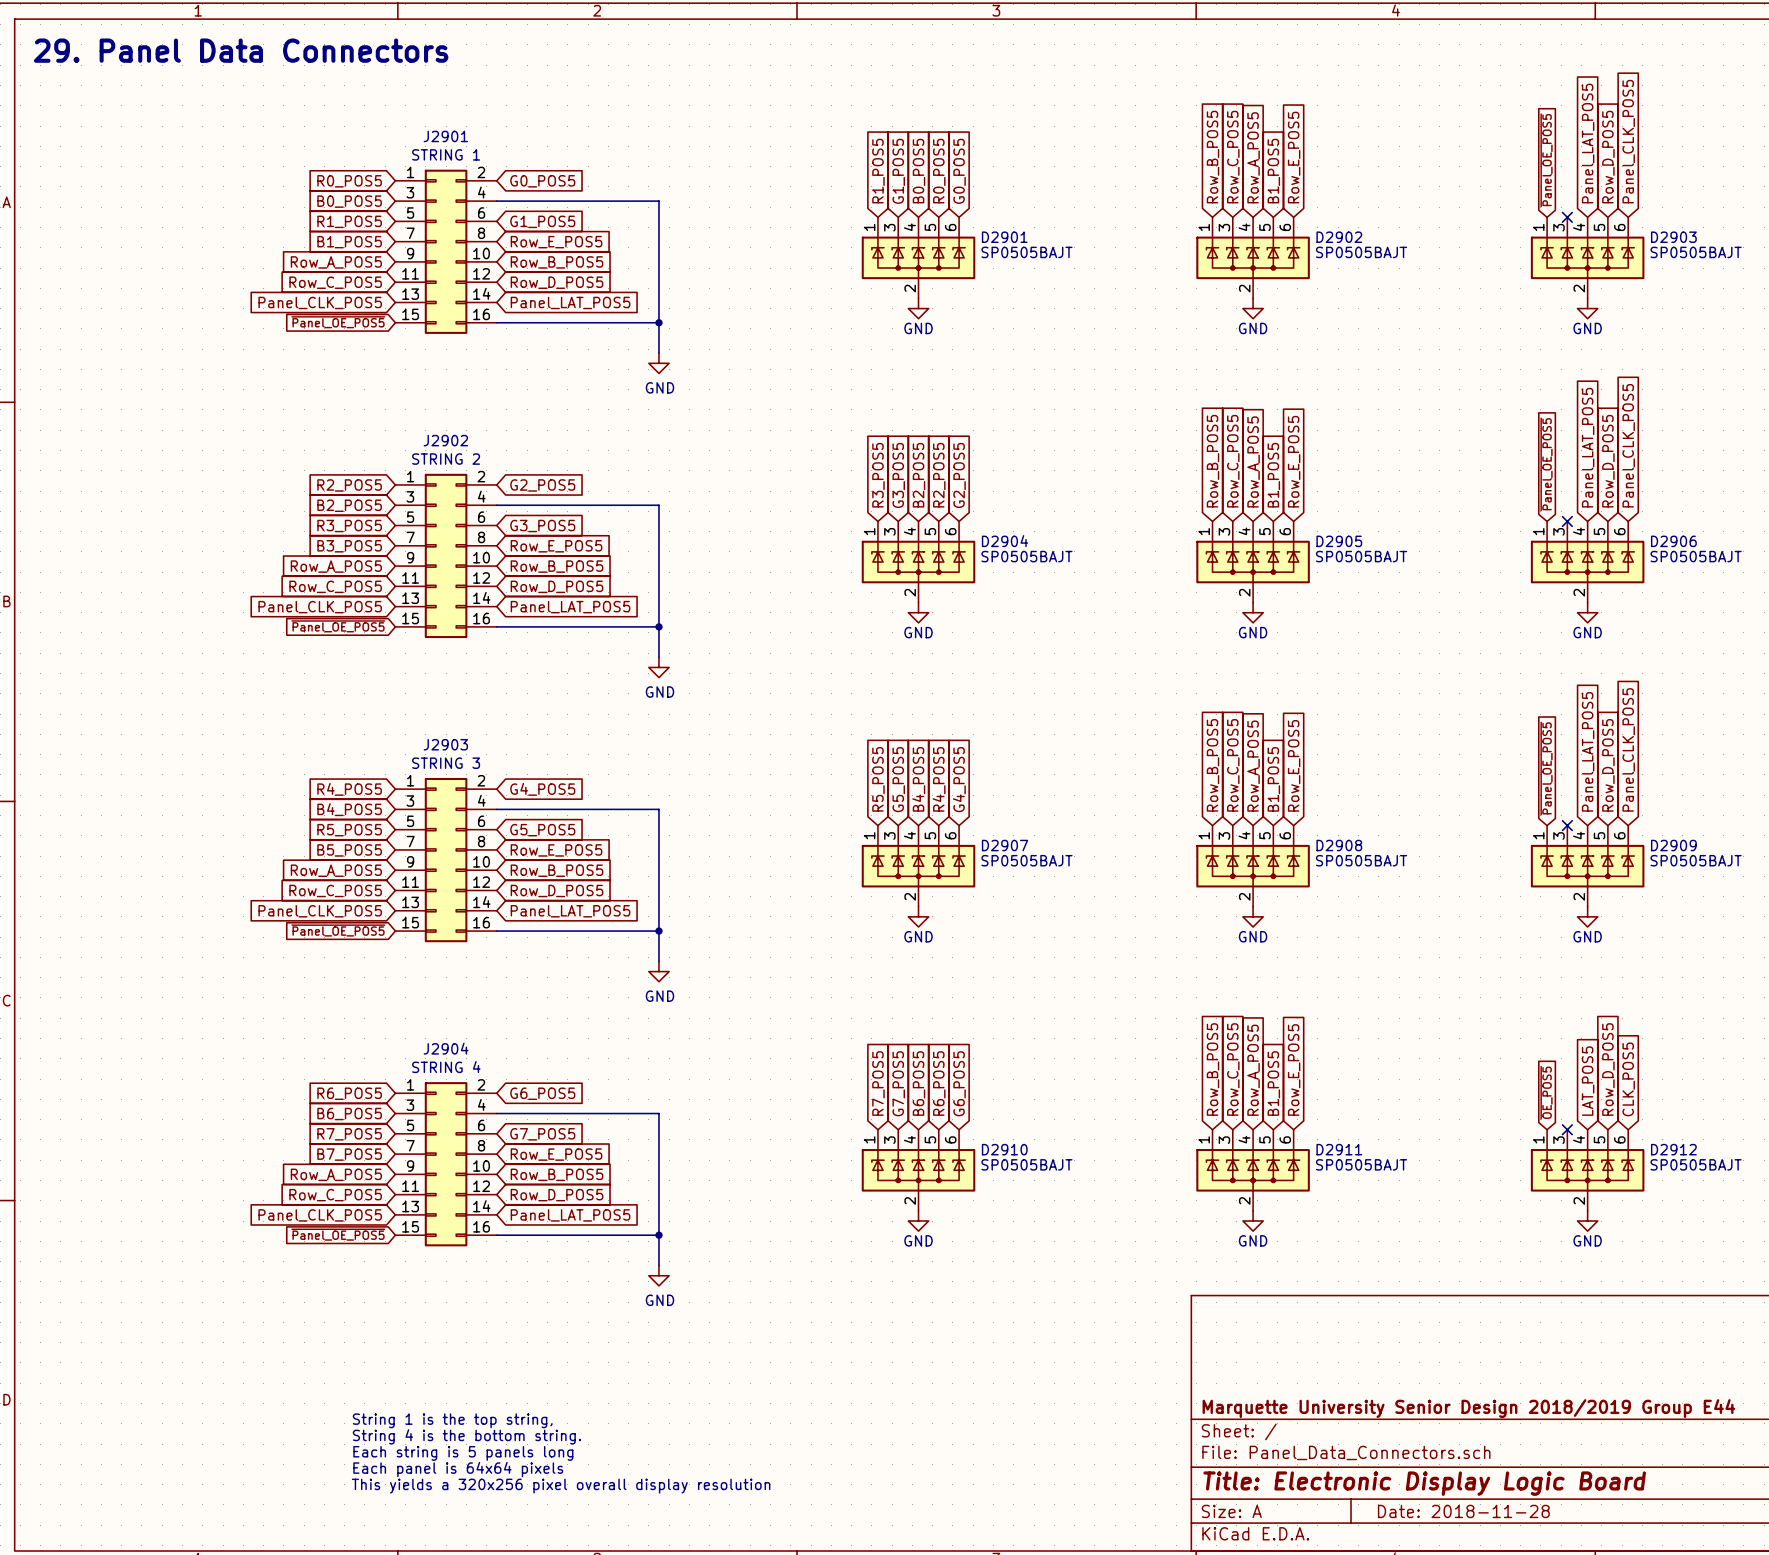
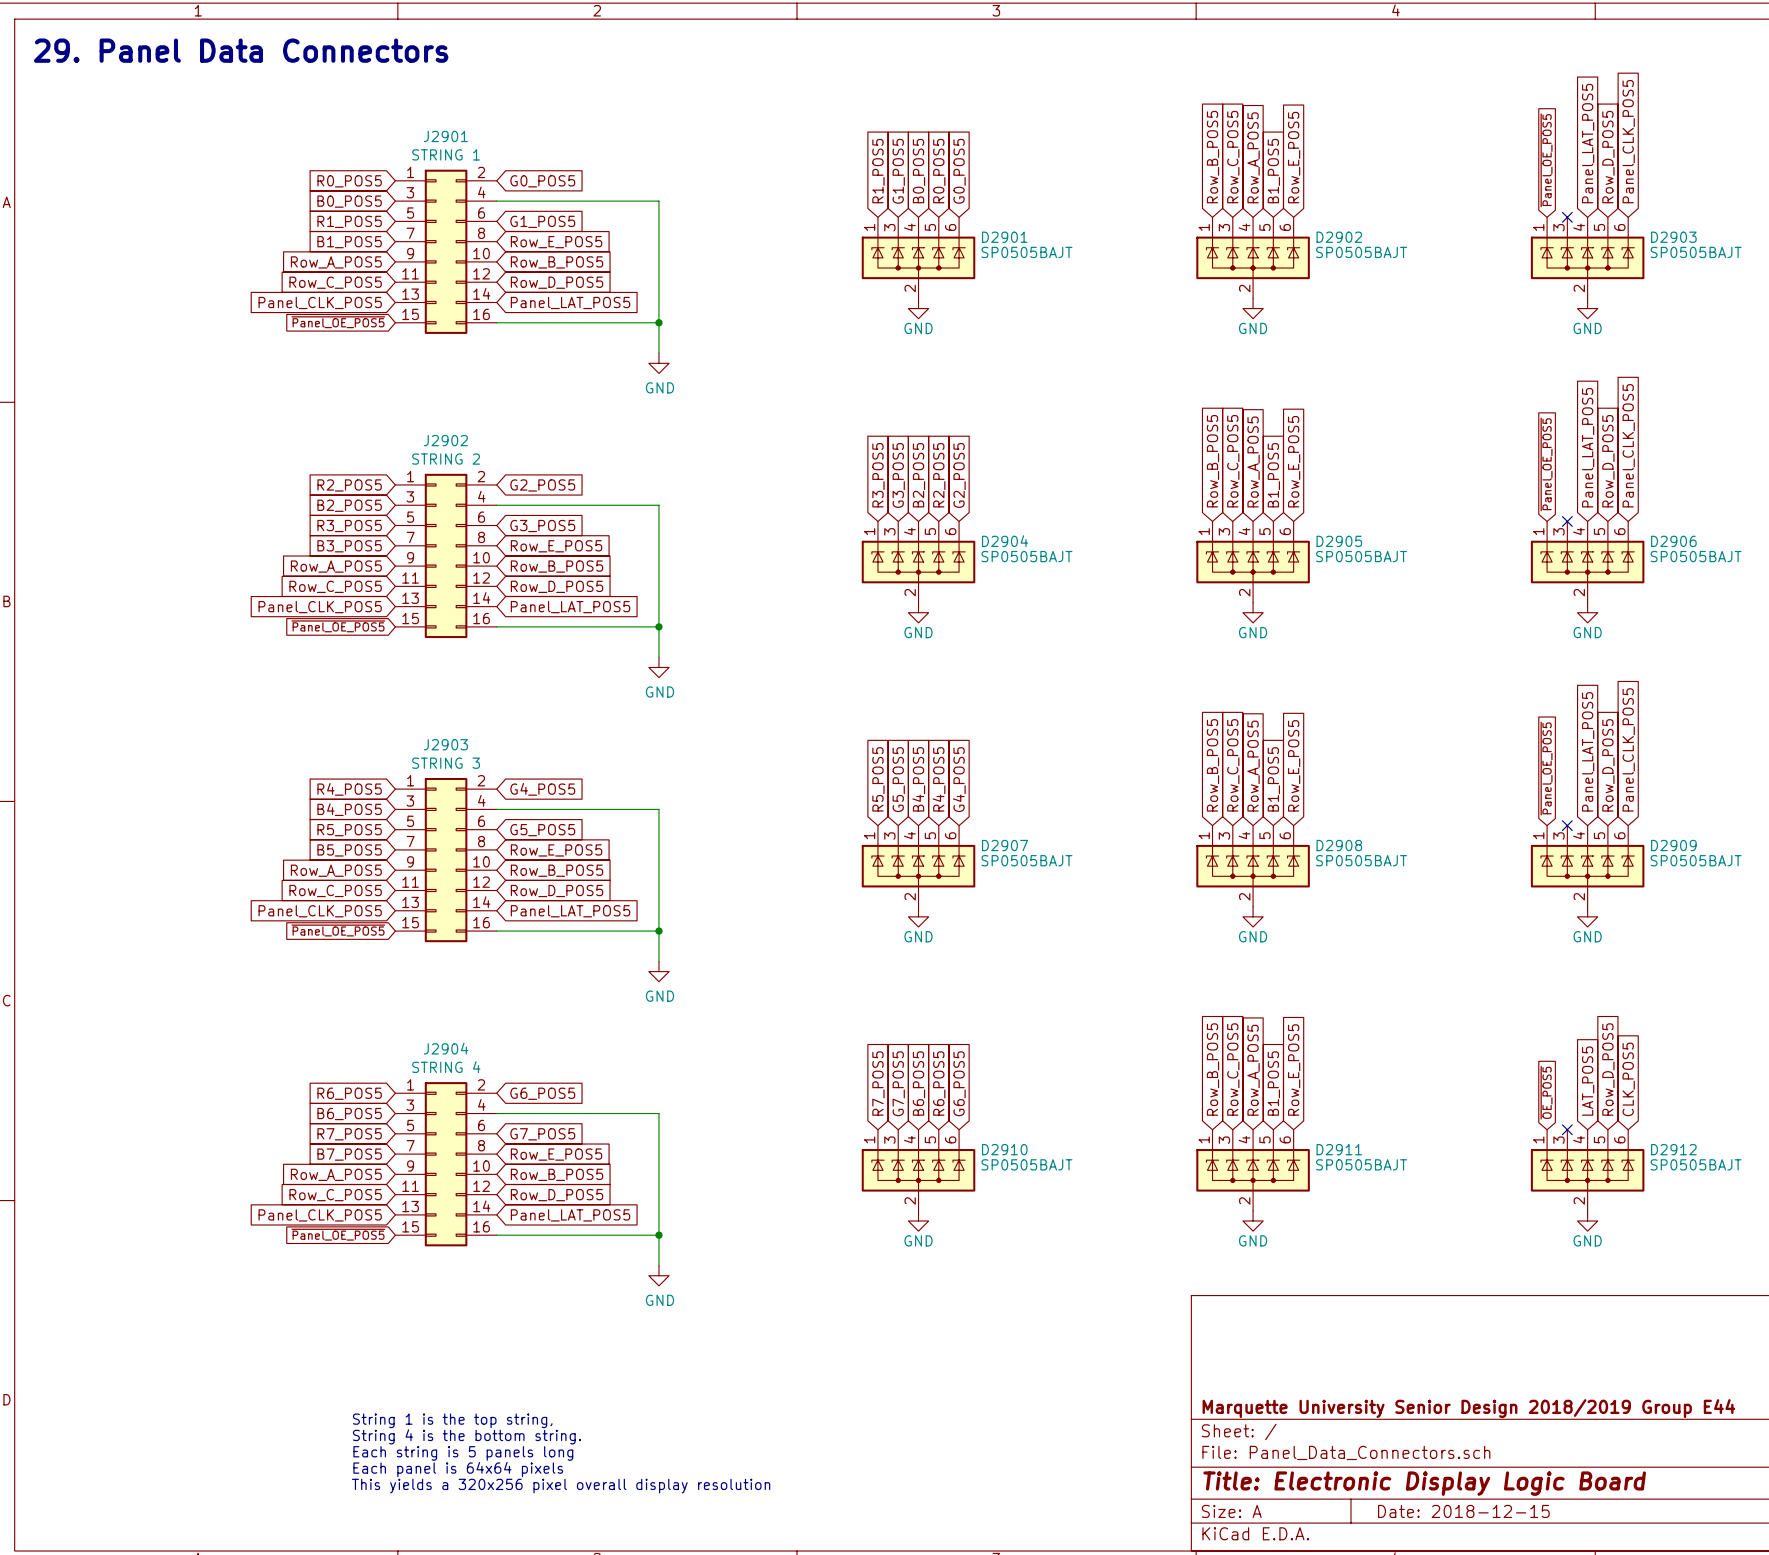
title block: Date: 2018-11-28 (1463, 1511) -> Date: 2018-12-15 (1463, 1511)

